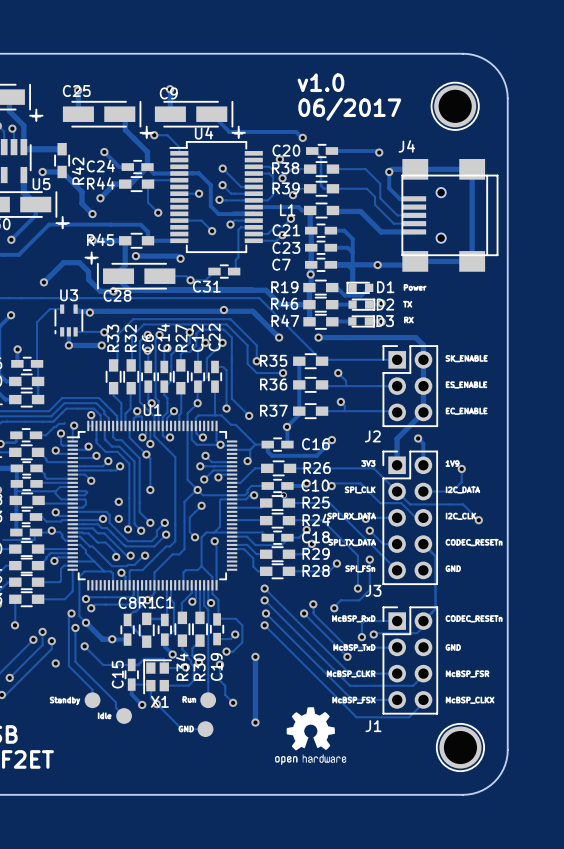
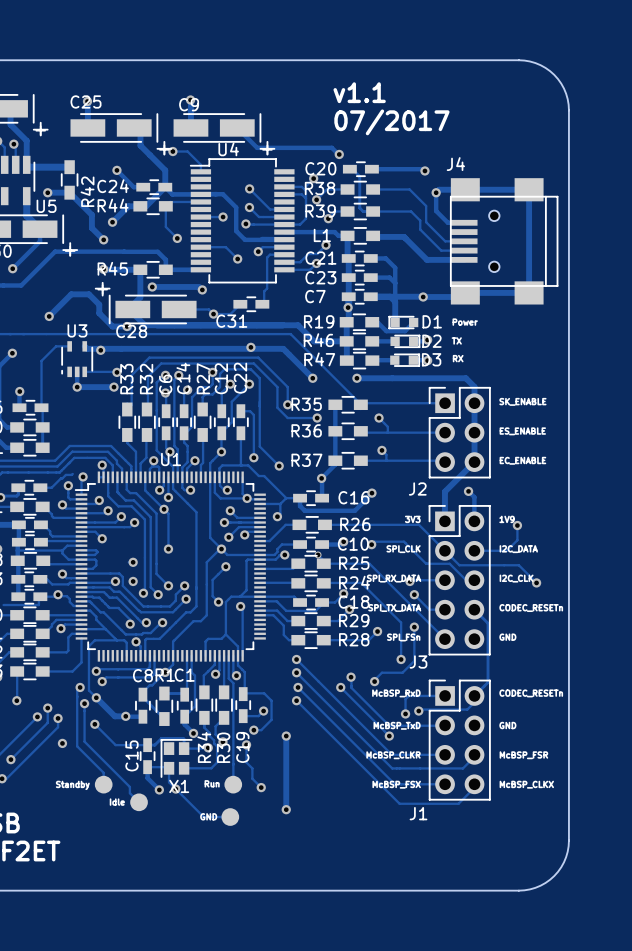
text: v1.0 (320, 82) -> v1.1 (359, 92)
part: (455, 106) -> none
text: 06/2017 (349, 109) -> 07/2017 (391, 122)
drawing: [275, 707, 347, 765] -> none
part: (460, 747) -> none

